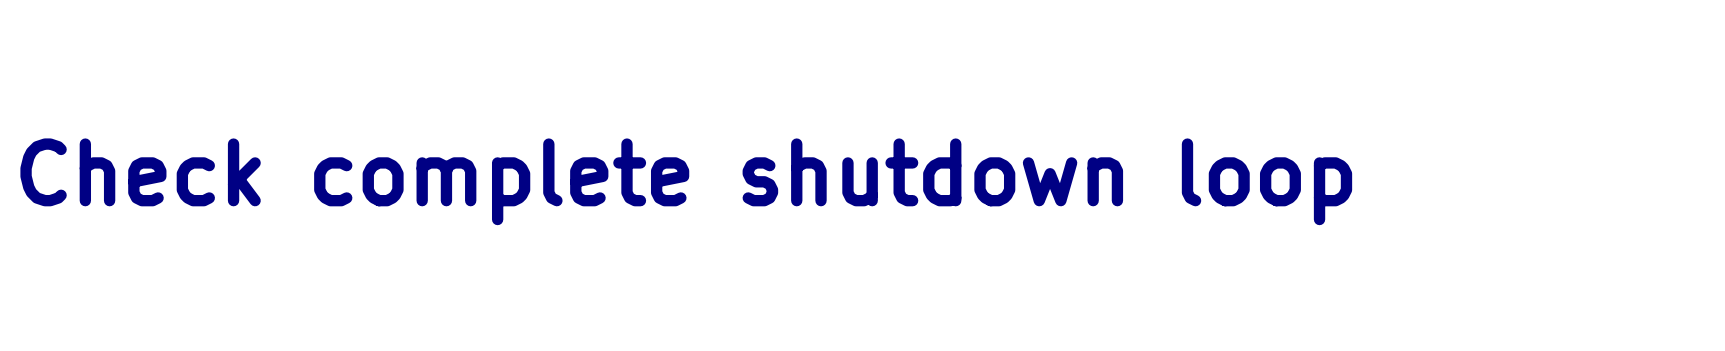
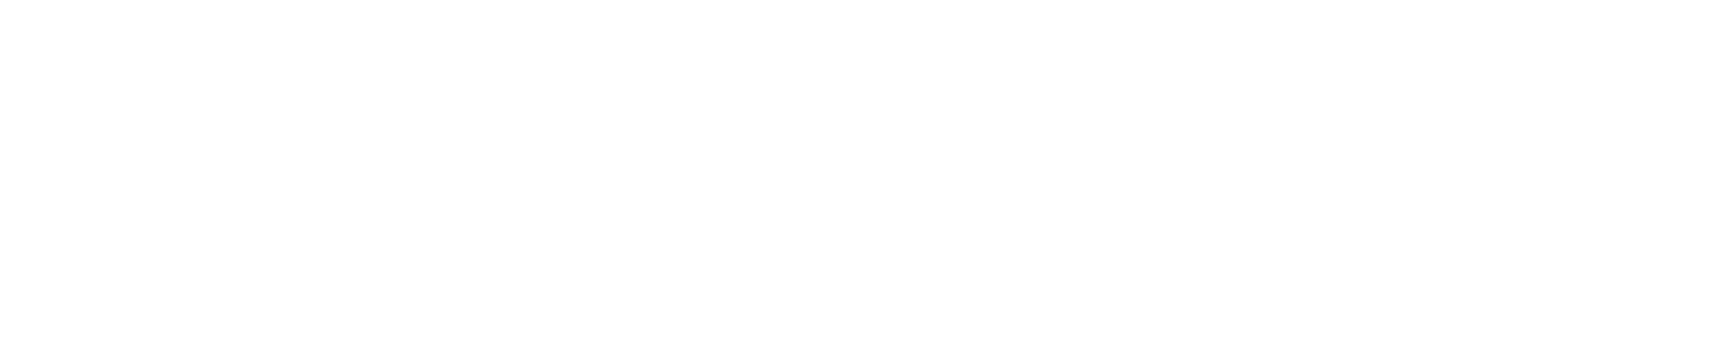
text: Check complete shutdown loop (686, 181) -> none

